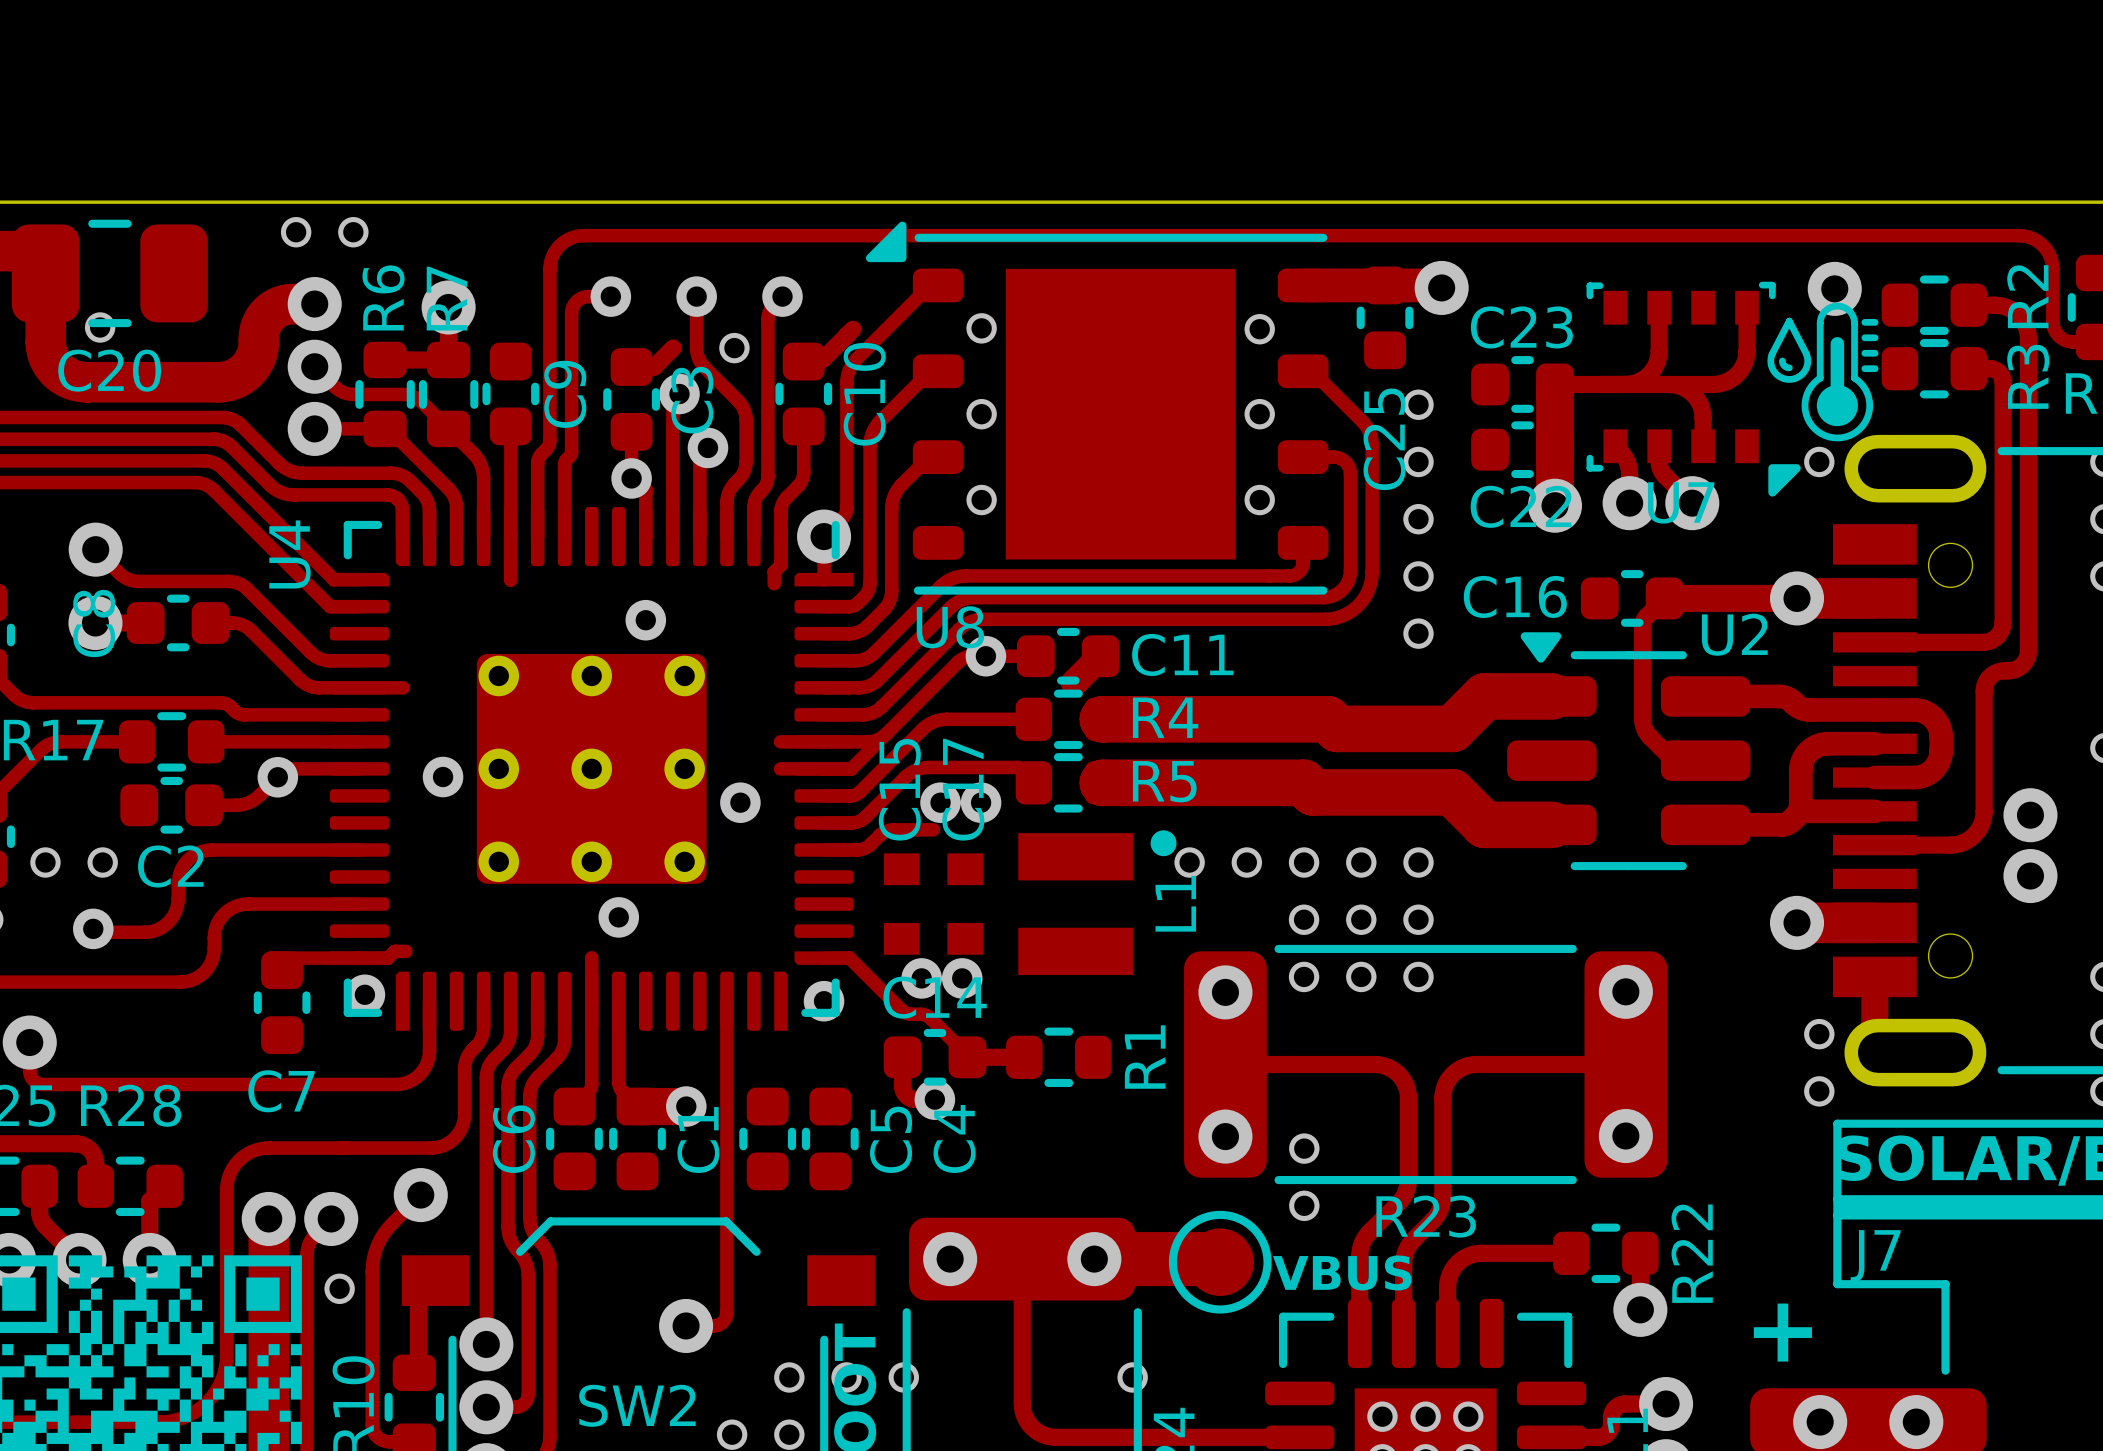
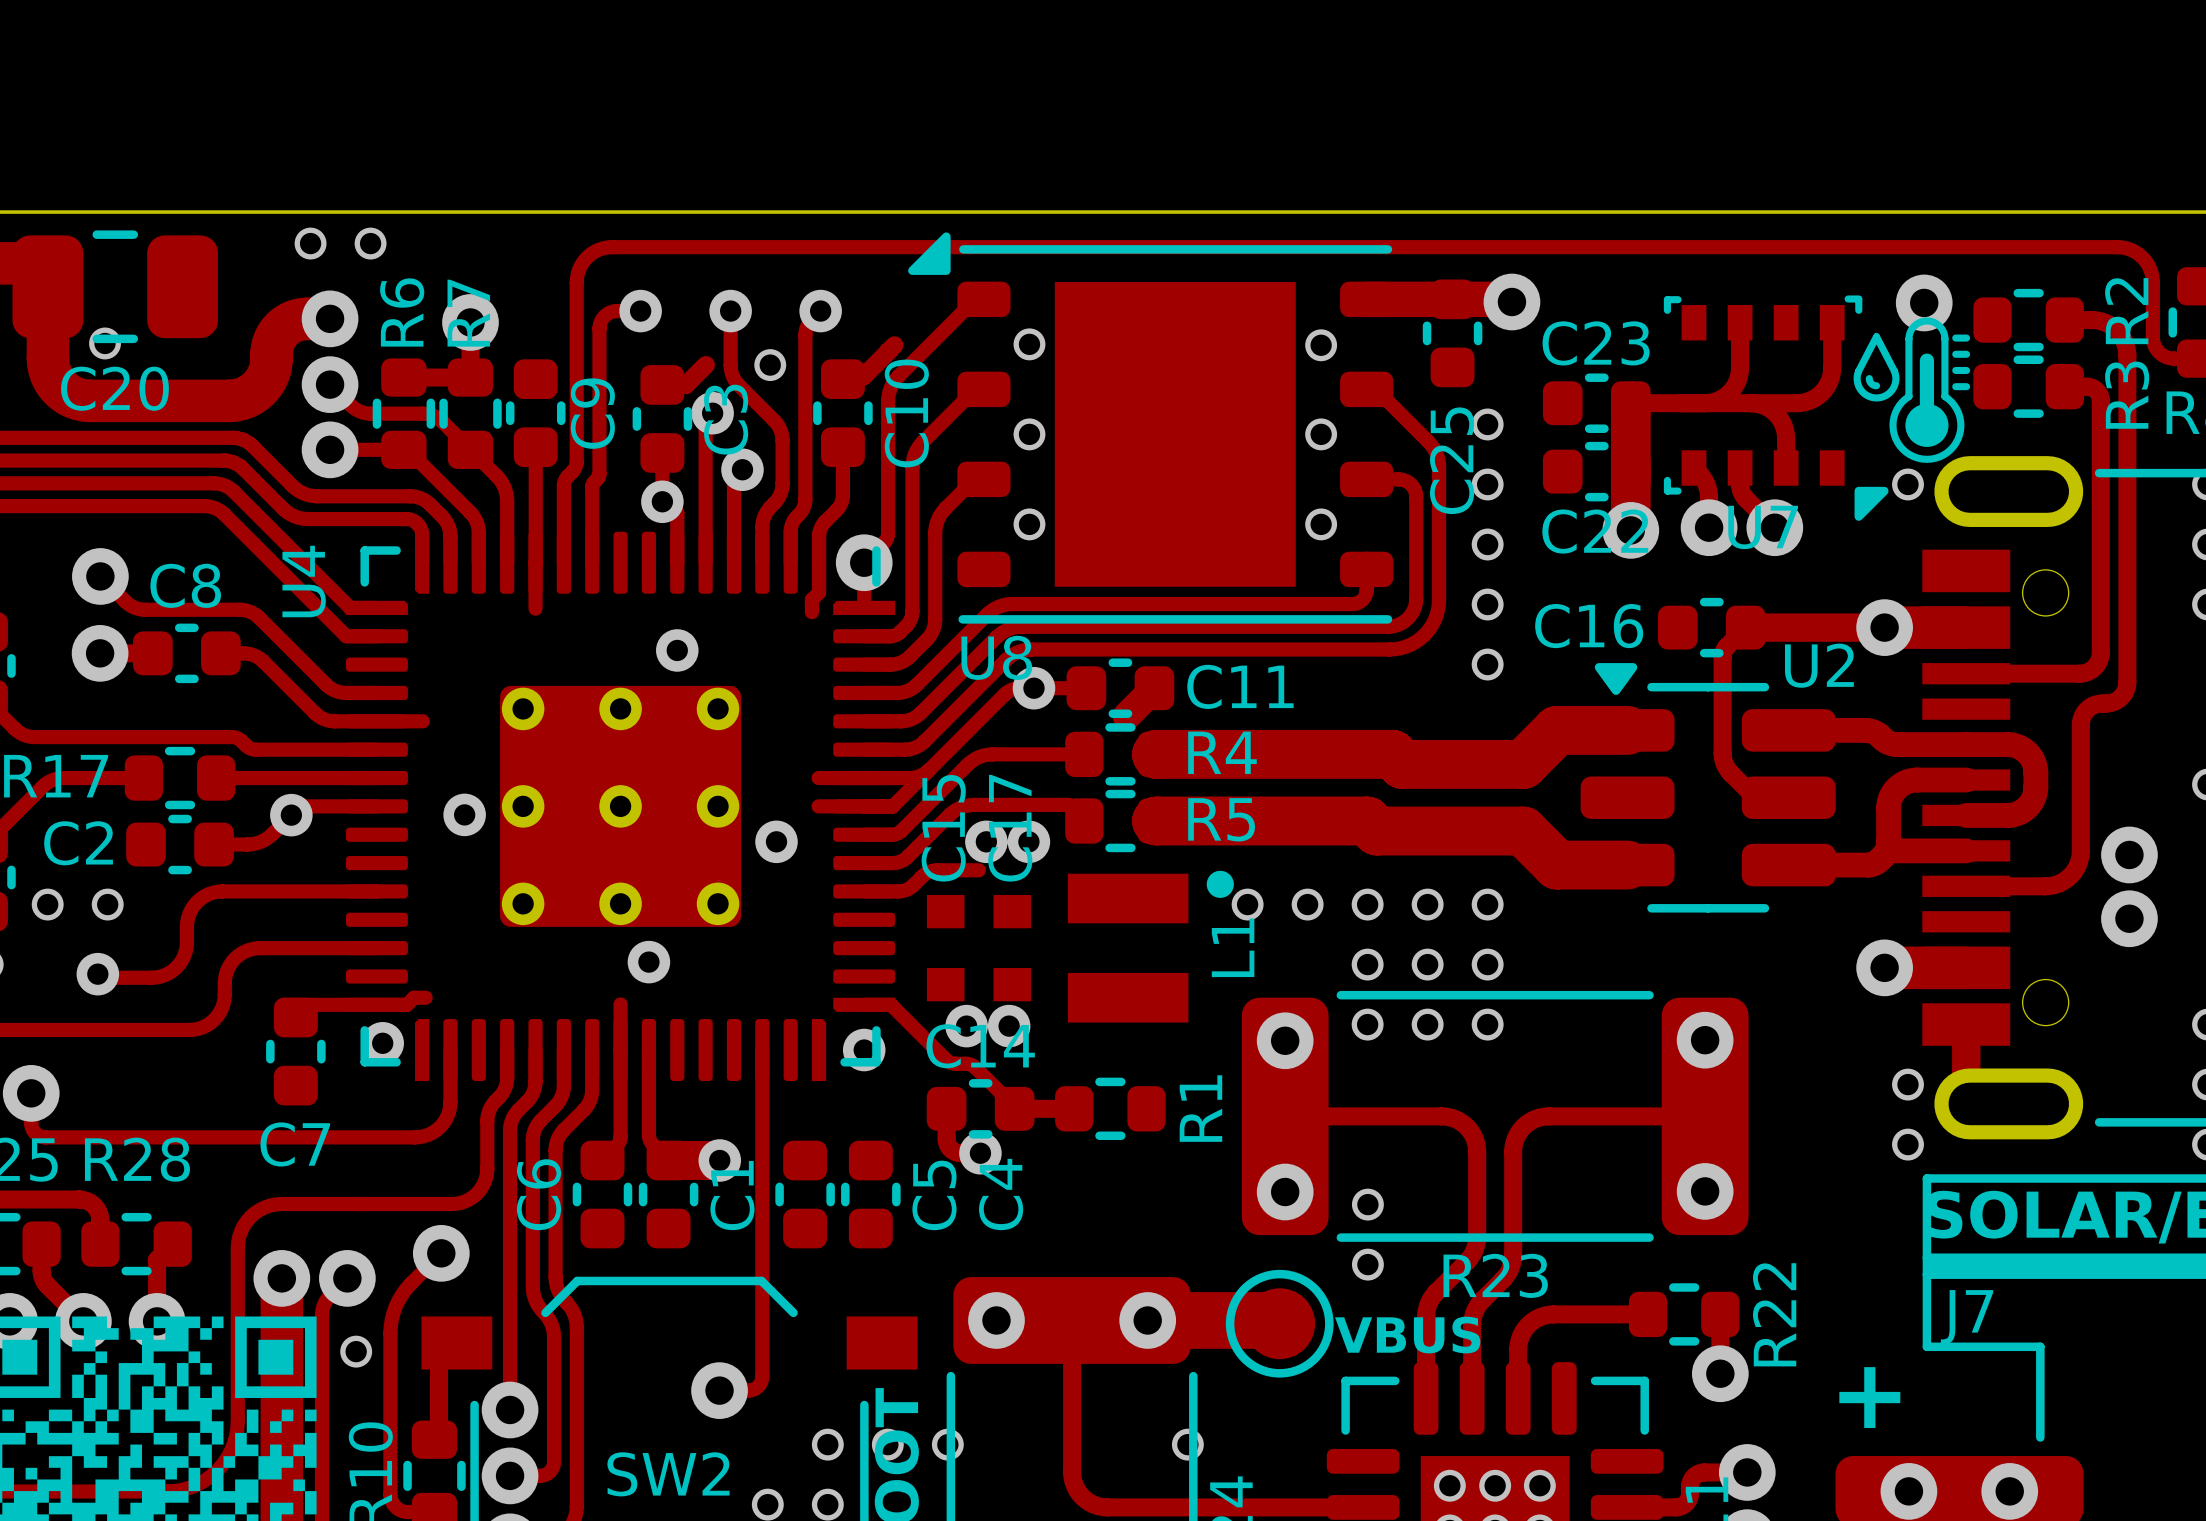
C8 name rotation: 0° (94, 623) -> 90° clockwise (185, 585)
C8 name position: C8 (94, 623) -> C8 (185, 585)
C2 name position: C2 (170, 866) -> C2 (78, 843)

